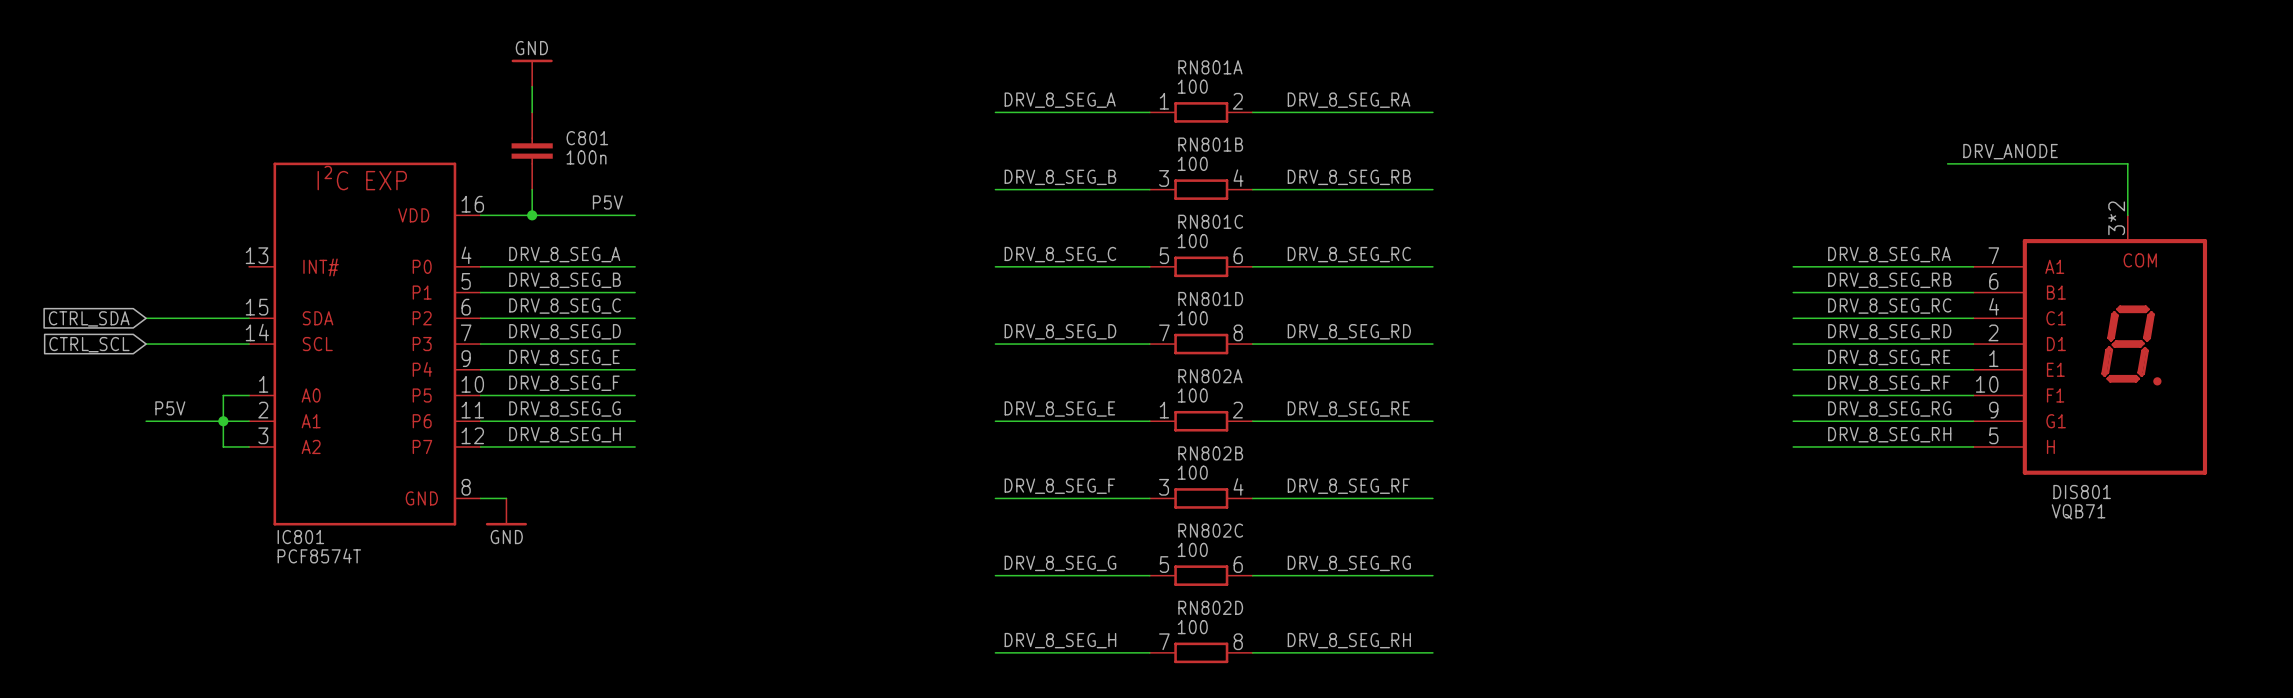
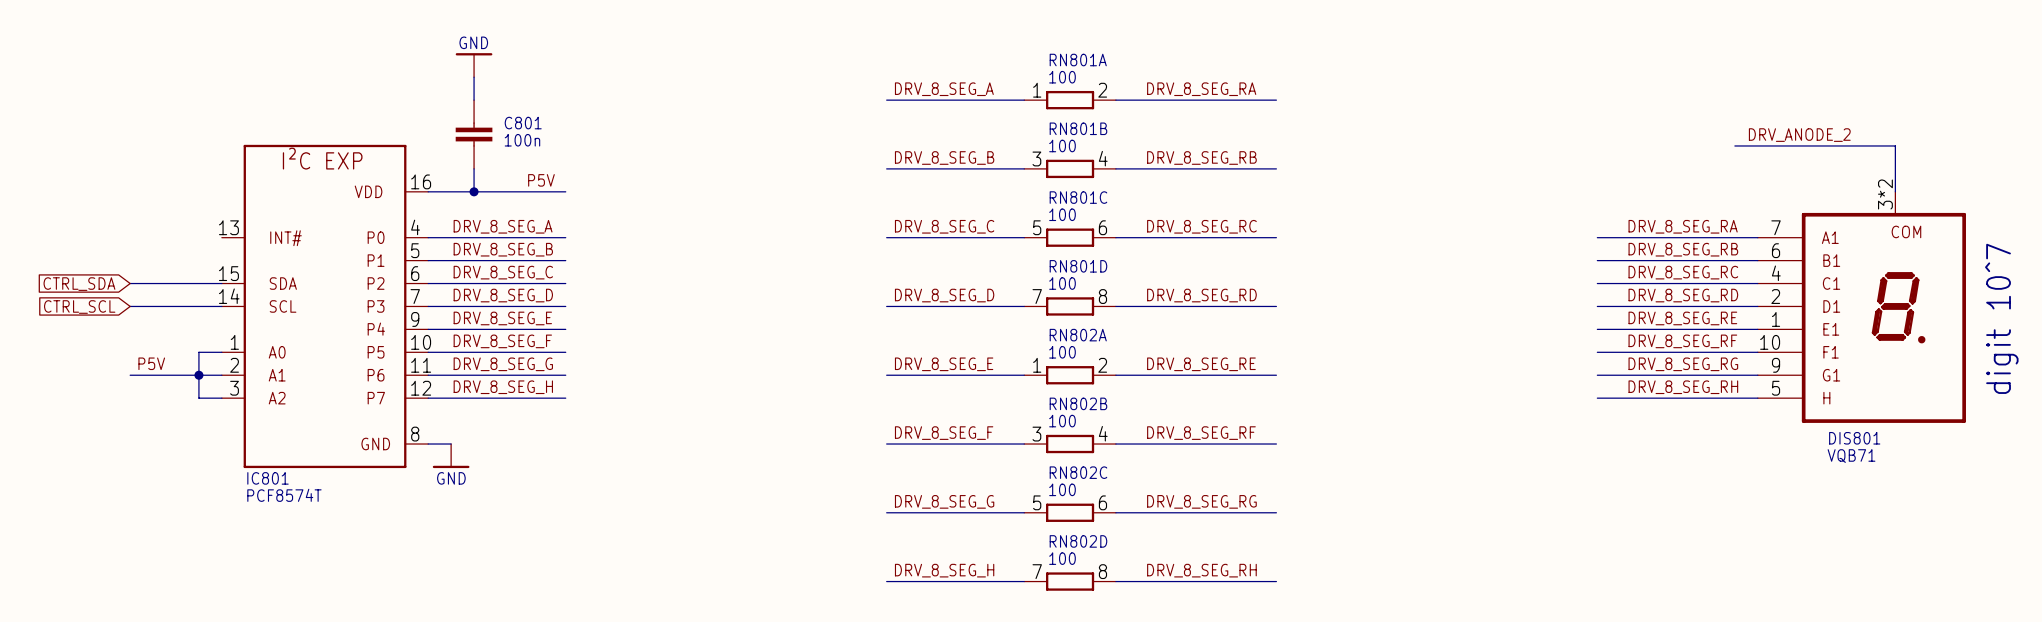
label: DRV_ANODE (2010, 151) -> DRV_ANODE_2 (1799, 135)
DIS801 text: none -> digit 10^7 (2001, 318)

